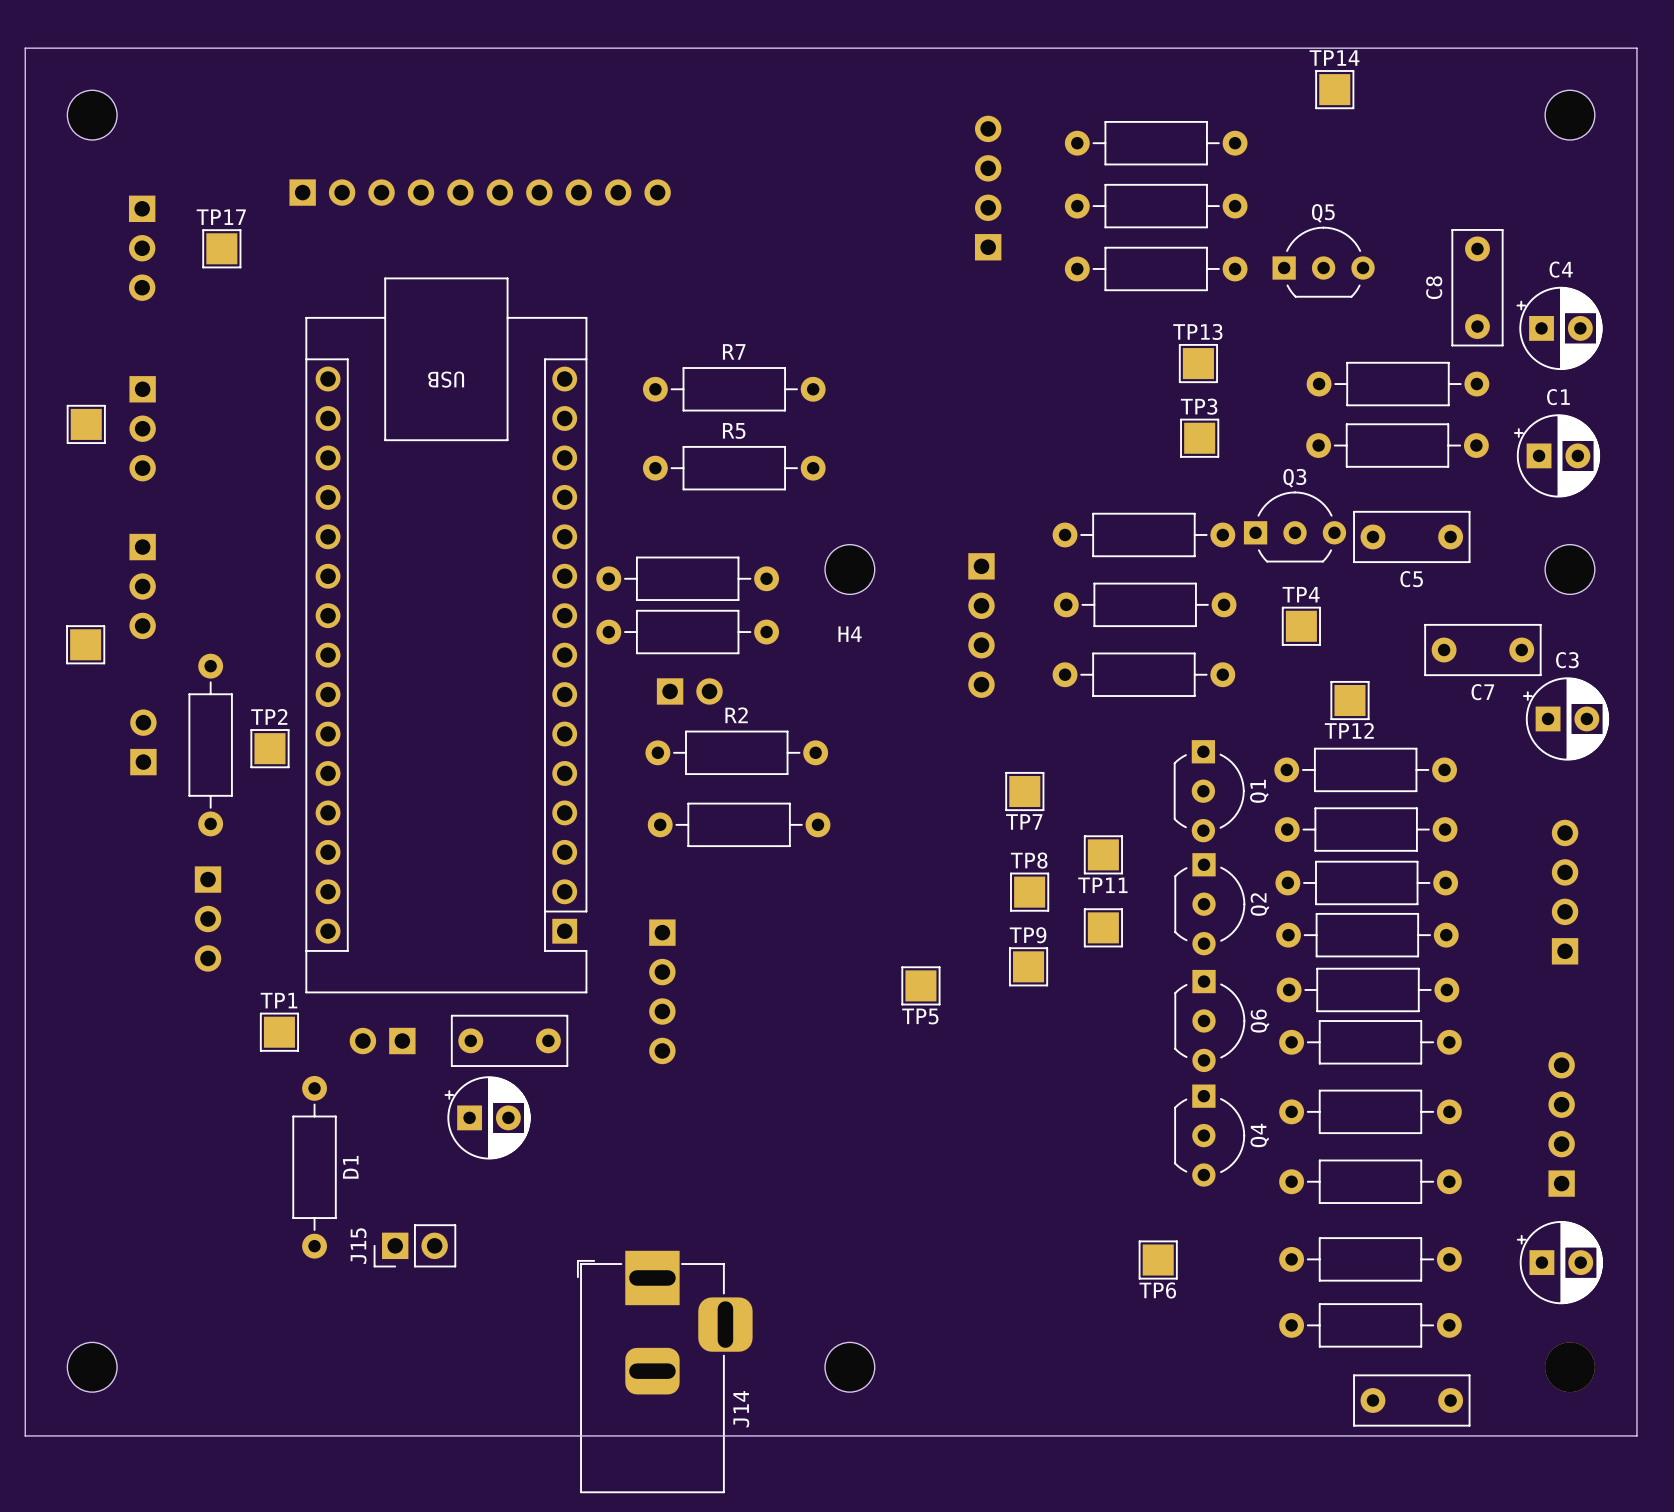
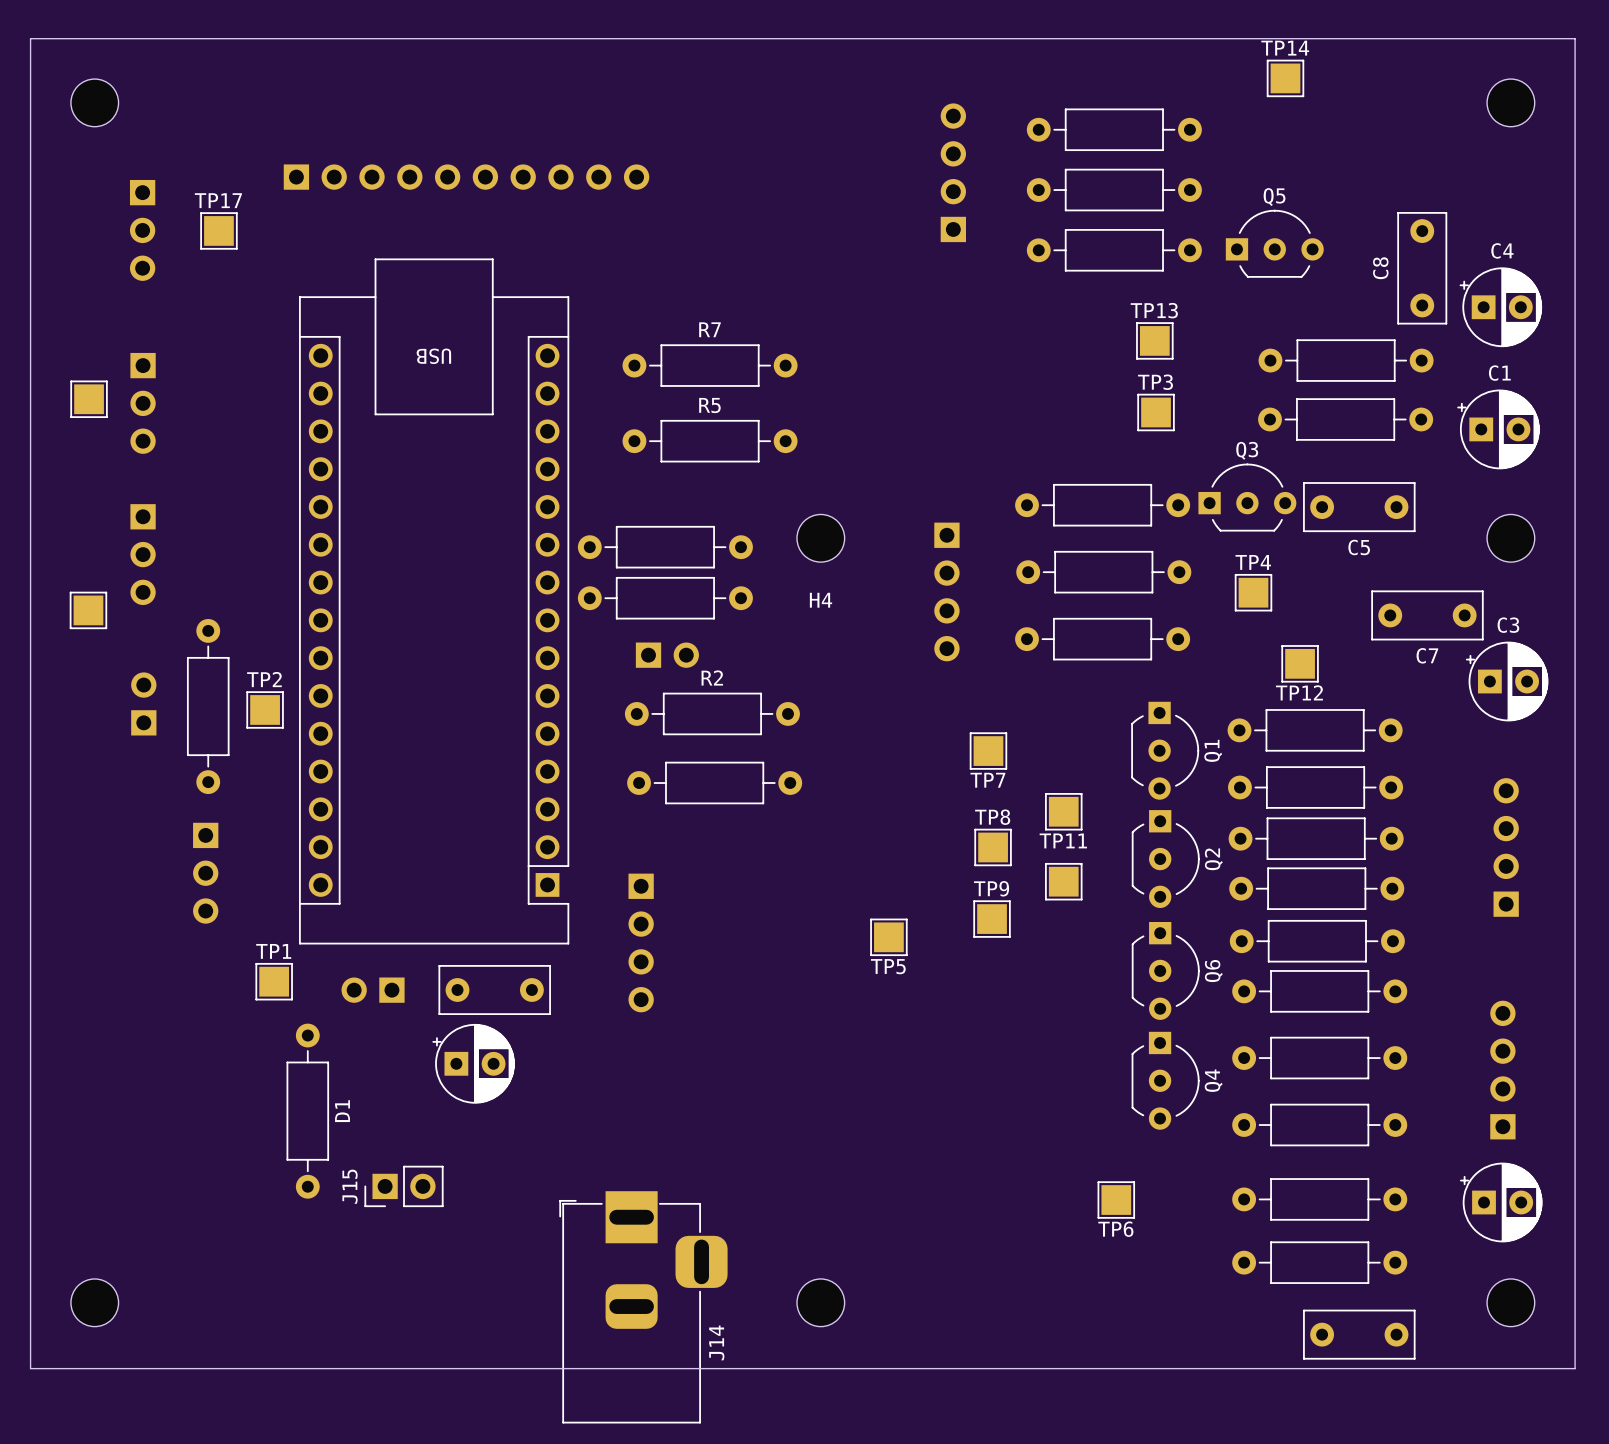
part footprint: [1545, 1342, 1595, 1393] -> [1487, 1278, 1535, 1327]

